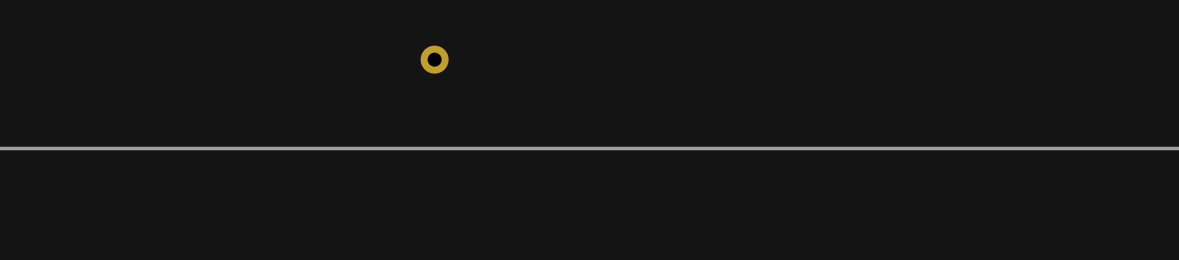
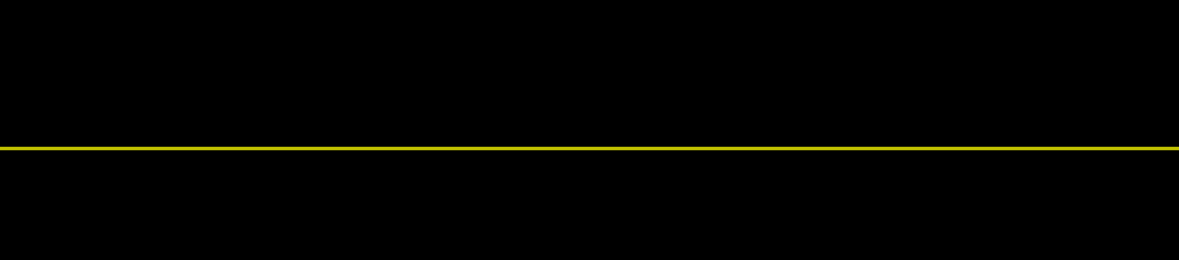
via: (434, 59) -> none

